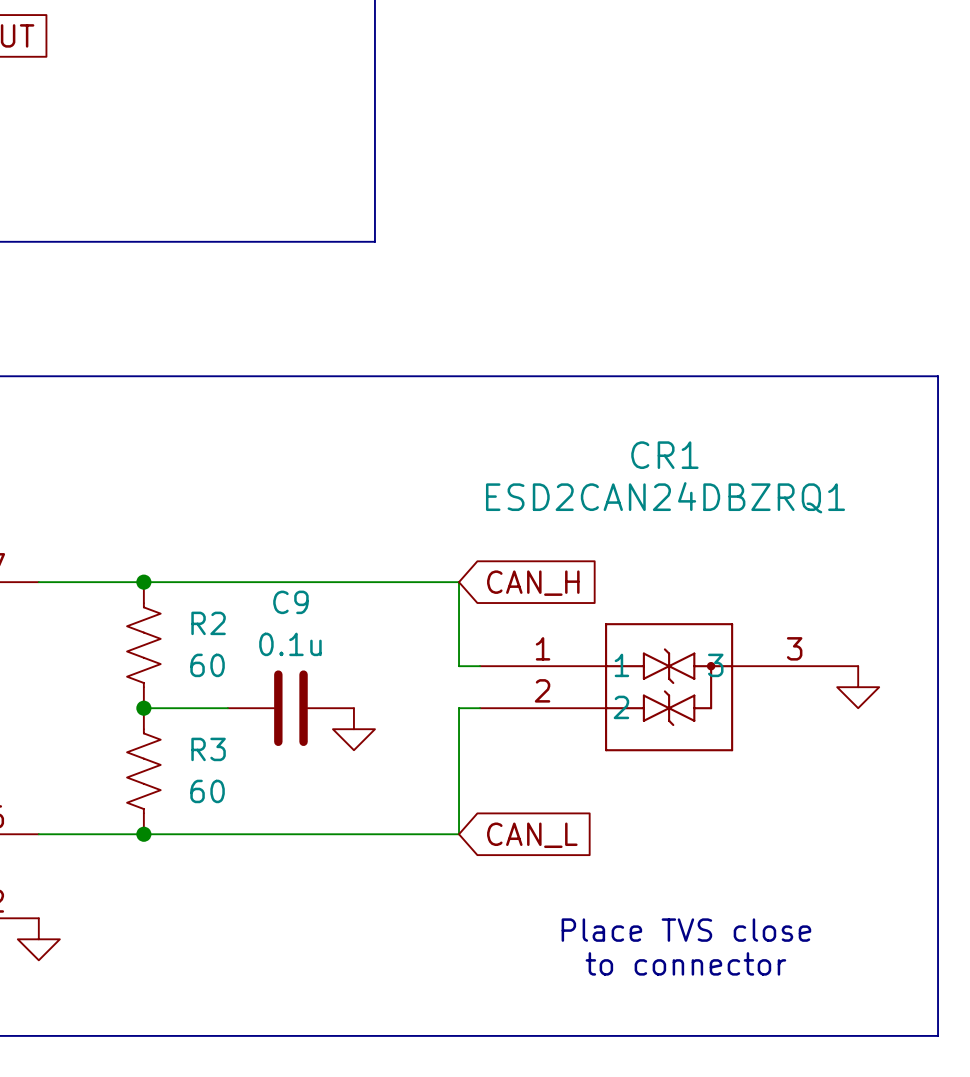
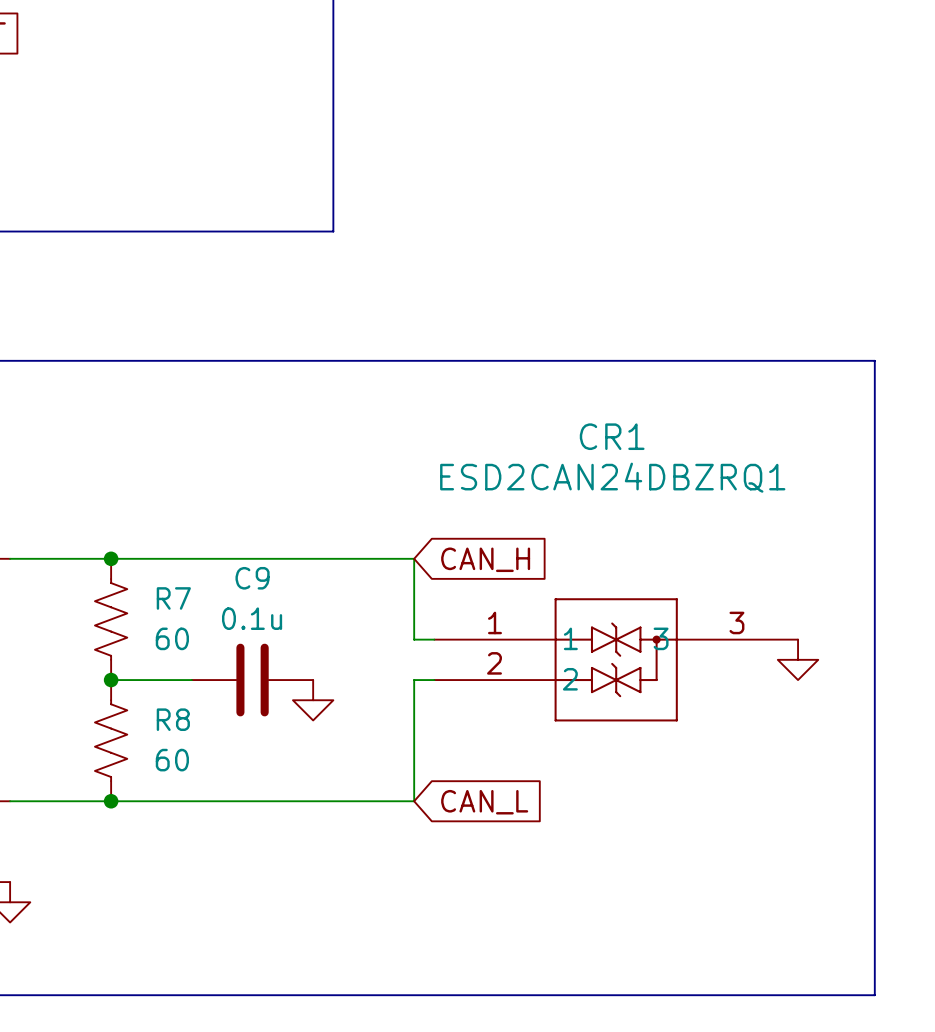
R2 name: R2 (208, 623) -> R7 (173, 598)
R3 name: R3 (208, 749) -> R8 (173, 719)
text: Place TVS close (686, 930) -> none
text: to connector (685, 963) -> none

